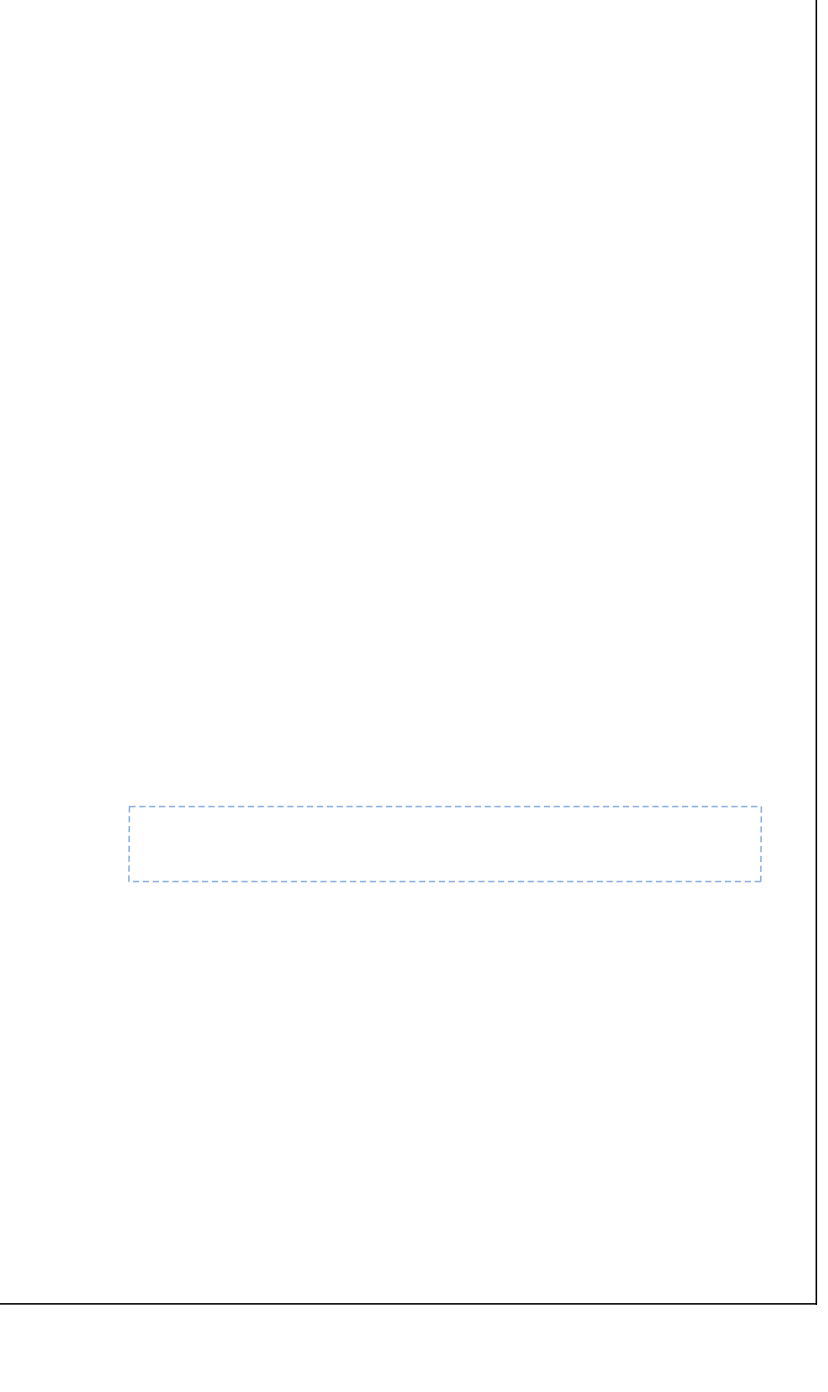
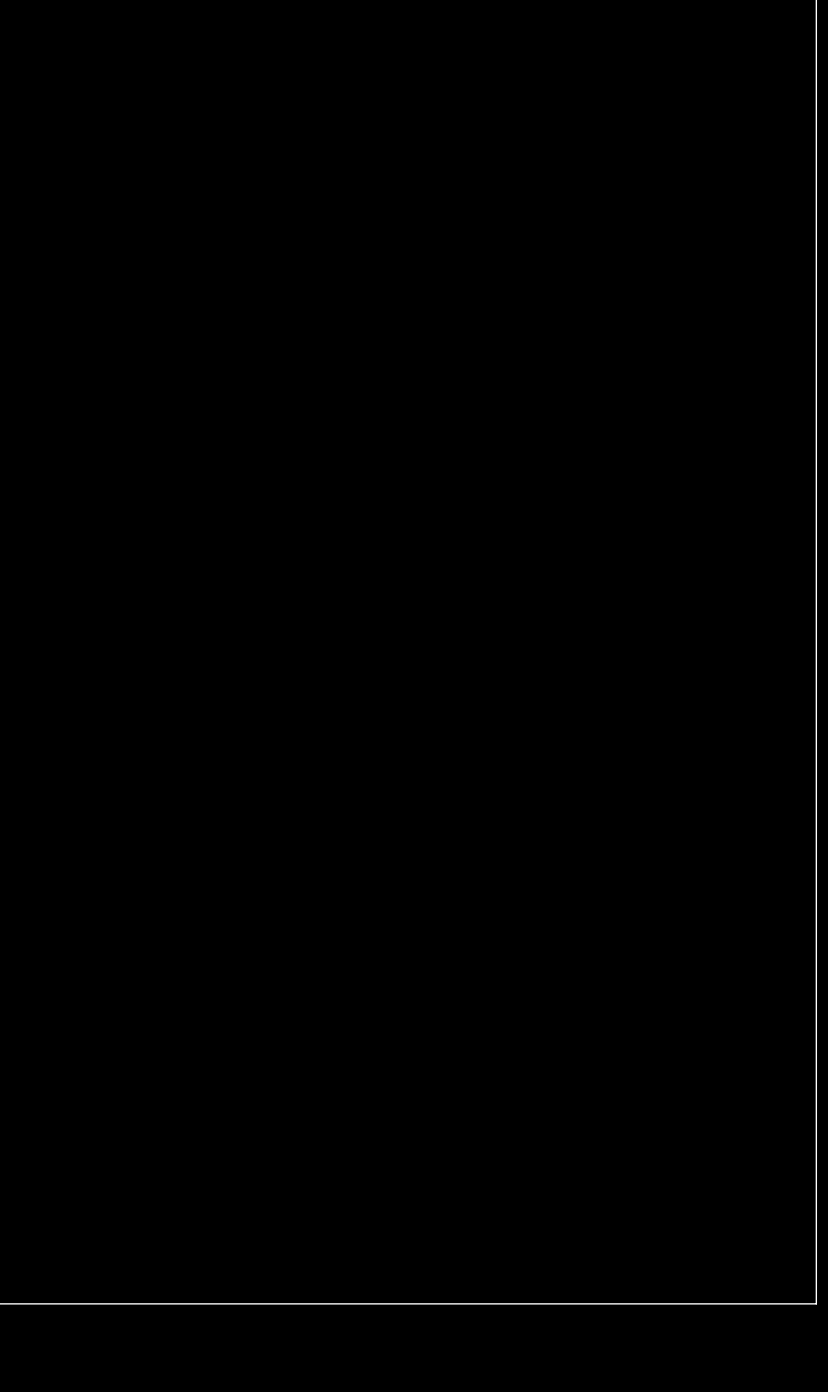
zone outline: (761, 806) (760, 881) (128, 881) (129, 806) (761, 806) -> none

